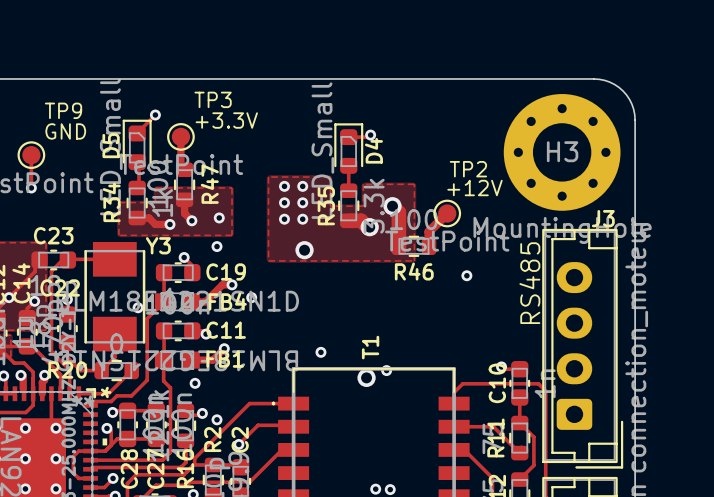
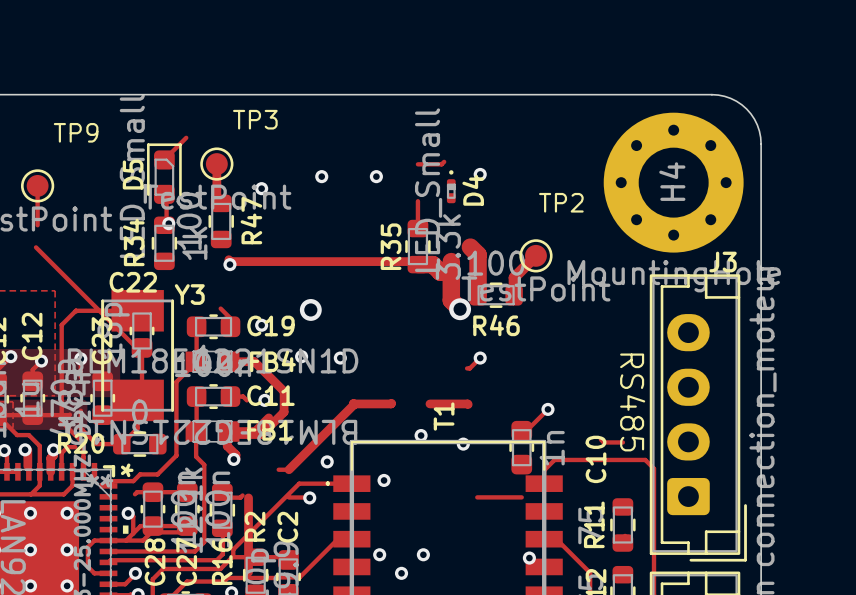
via: (155, 115) -> none
text: +3.3V (226, 120) -> none
D4 footprint: [334, 123, 364, 174] -> [446, 170, 456, 204]
text: GND (65, 131) -> none
via: (370, 135) -> none
via: none -> (480, 174)
via: none -> (321, 176)
via: none -> (376, 176)
H3 name: H3 (562, 151) -> H4 (672, 181)
via: none -> (261, 188)
zone outline: (268, 177) (268, 260) (414, 260) (414, 184) (363, 184) (363, 206) (330, 206) (330, 177) (268, 177) -> none
via: none -> (168, 223)
via: (284, 186) -> none
via: (302, 186) -> none
via: (31, 187) -> none
zone outline: (155, 187) (155, 202) (118, 202) (118, 235) (232, 235) (232, 187) (155, 187) -> none
text: +12V (475, 188) -> none
track: (184, 199) (184, 213) (191, 220) -> none
via: (284, 202) -> none
via: (302, 202) -> none
track: none -> (36, 247) (136, 347) (142, 347) (142, 379)
via: (392, 206) -> none
track: none -> (228, 259) (230, 261) (418, 261)
via: (219, 217) -> none
track: (137, 218) (149, 218) (155, 224) (170, 224) -> none
track: none -> (451, 261) (451, 300) (460, 309)
via: (284, 219) -> none
via: (302, 219) -> none
via: (170, 224) -> none
via: (369, 227) -> none
via: (217, 246) -> none
via: (304, 250) -> none
via: (184, 257) -> none
via: none -> (310, 309)
via: none -> (460, 309)
track: (35, 259) (35, 271) (9, 297) -> none
C23 rotation: 0° (53, 260) -> 90° clockwise (102, 398)
C23 position: (53, 260) -> (102, 398)
via: none -> (261, 325)
via: (466, 275) -> none
C14 name: C14 (21, 283) -> C12 (32, 336)
text rotation: 0° (529, 283) -> 180° (632, 402)
track: (232, 284) (222, 284) (205, 301) -> (235, 459) (235, 454) (227, 446) (227, 432) (229, 434) (261, 434) (284, 412) (284, 391) (254, 361) (246, 361)
via: (232, 284) -> none
via: none -> (340, 358)
track: none -> (480, 358) (469, 368) (467, 368)
via: none -> (480, 358)
via: (138, 307) -> none
C22 position: (67, 328) -> (142, 330)
via: (206, 334) -> none
via: none -> (264, 400)
track: none -> (353, 403) (288, 469) (278, 469)
track: none -> (391, 403) (353, 403)
track: none -> (429, 403) (468, 404)
track: none -> (547, 409) (526, 430) (521, 430)
via: none -> (547, 409)
track: (32, 346) (60, 374) (60, 393) -> (38, 415) (69, 414)
via: (224, 348) -> none
via: (320, 352) -> none
via: none -> (421, 435)
via: (501, 366) -> none
track: (131, 370) (108, 393) (78, 393) -> none
via: (366, 377) -> none
C10 position: (519, 383) -> (521, 447)
via: none -> (327, 461)
track: (51, 393) (51, 432) -> (61, 471) (61, 453) (67, 447) (75, 447)
track: none -> (72, 471) (72, 485) (63, 494) (31, 494)
track: (519, 397) (519, 423) (533, 437) (533, 465) (519, 479) -> none
via: none -> (384, 480)
via: (112, 412) -> none
via: (202, 413) -> none
track: none -> (248, 497) (248, 572)
track: none -> (288, 497) (309, 497)
via: none -> (309, 497)
track: none -> (477, 497) (521, 497)
via: (217, 419) -> none
track: (293, 426) (258, 425) (238, 444) -> none
track: (454, 426) (493, 426) (519, 453) -> none
track: none -> (187, 532) (152, 531) (143, 540) (126, 540)
via: (238, 444) -> none
via: none -> (379, 554)
via: none -> (423, 554)
via: none -> (529, 558)
via: none -> (401, 573)
via: (375, 489) -> none
via: (390, 489) -> none

